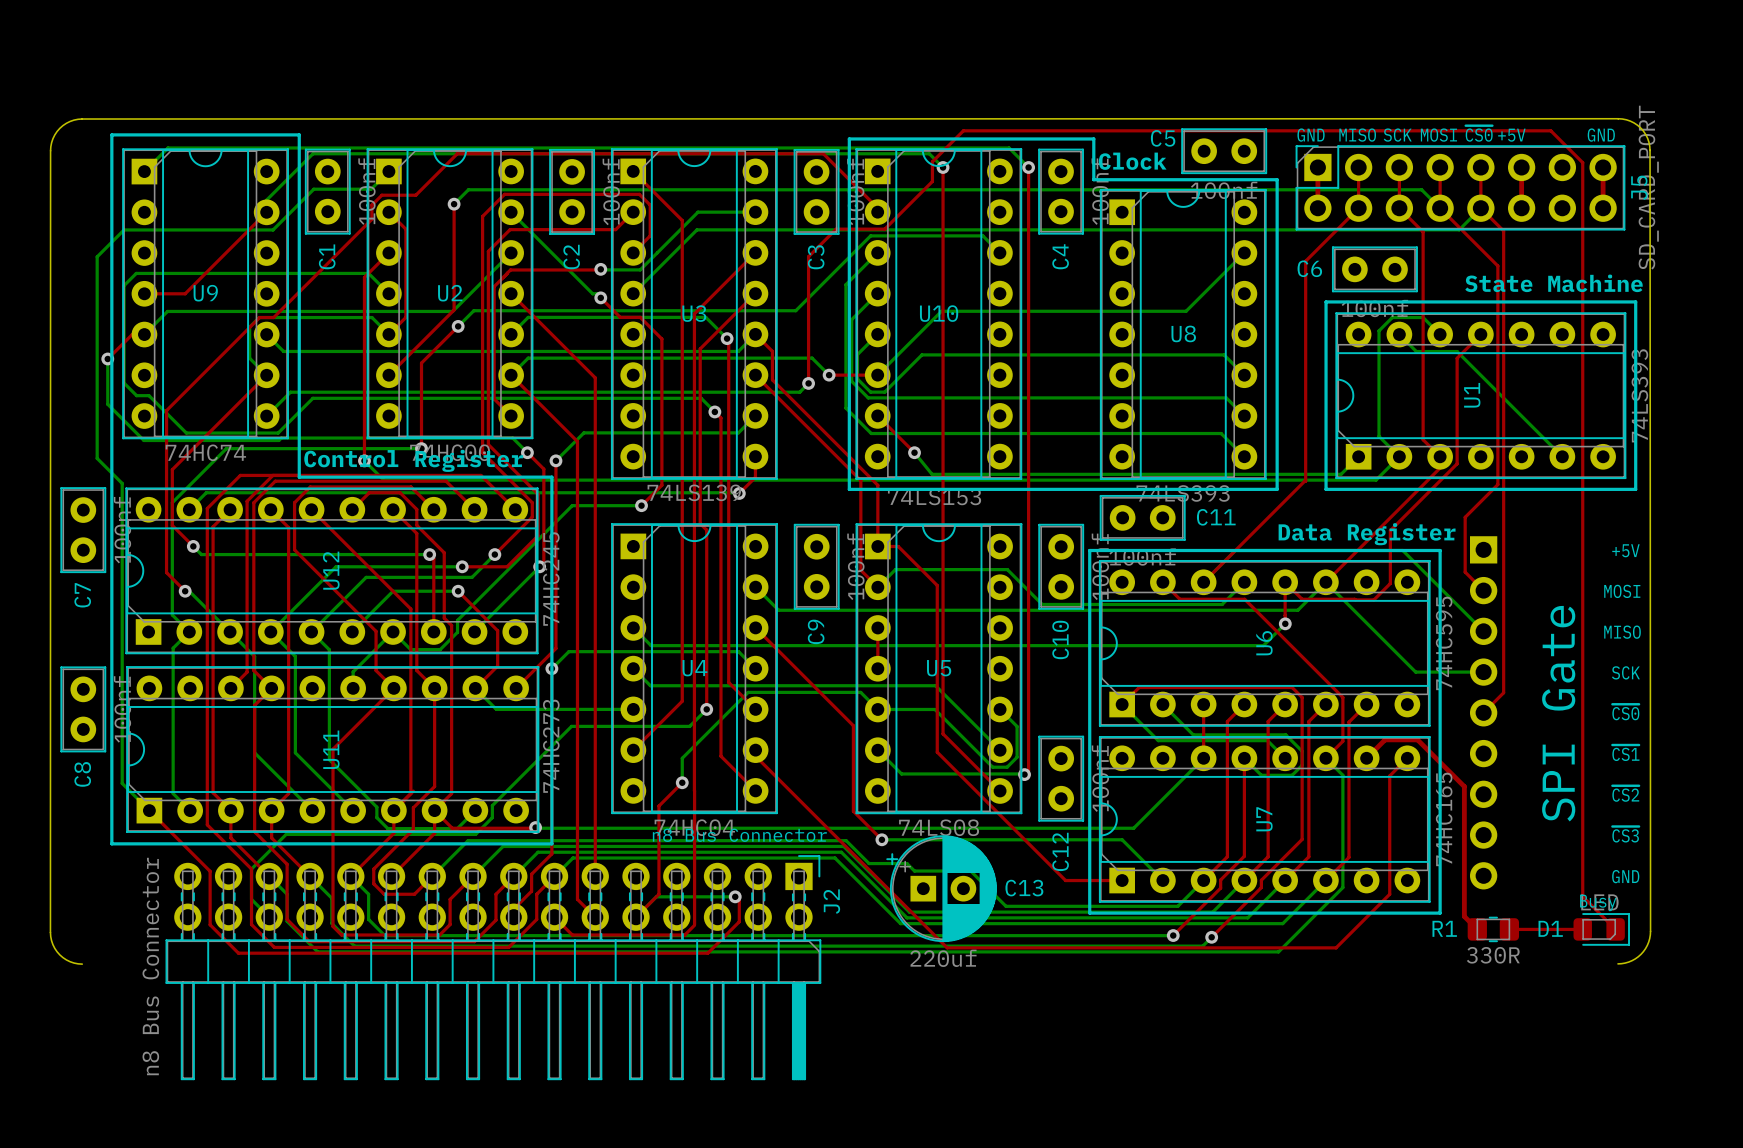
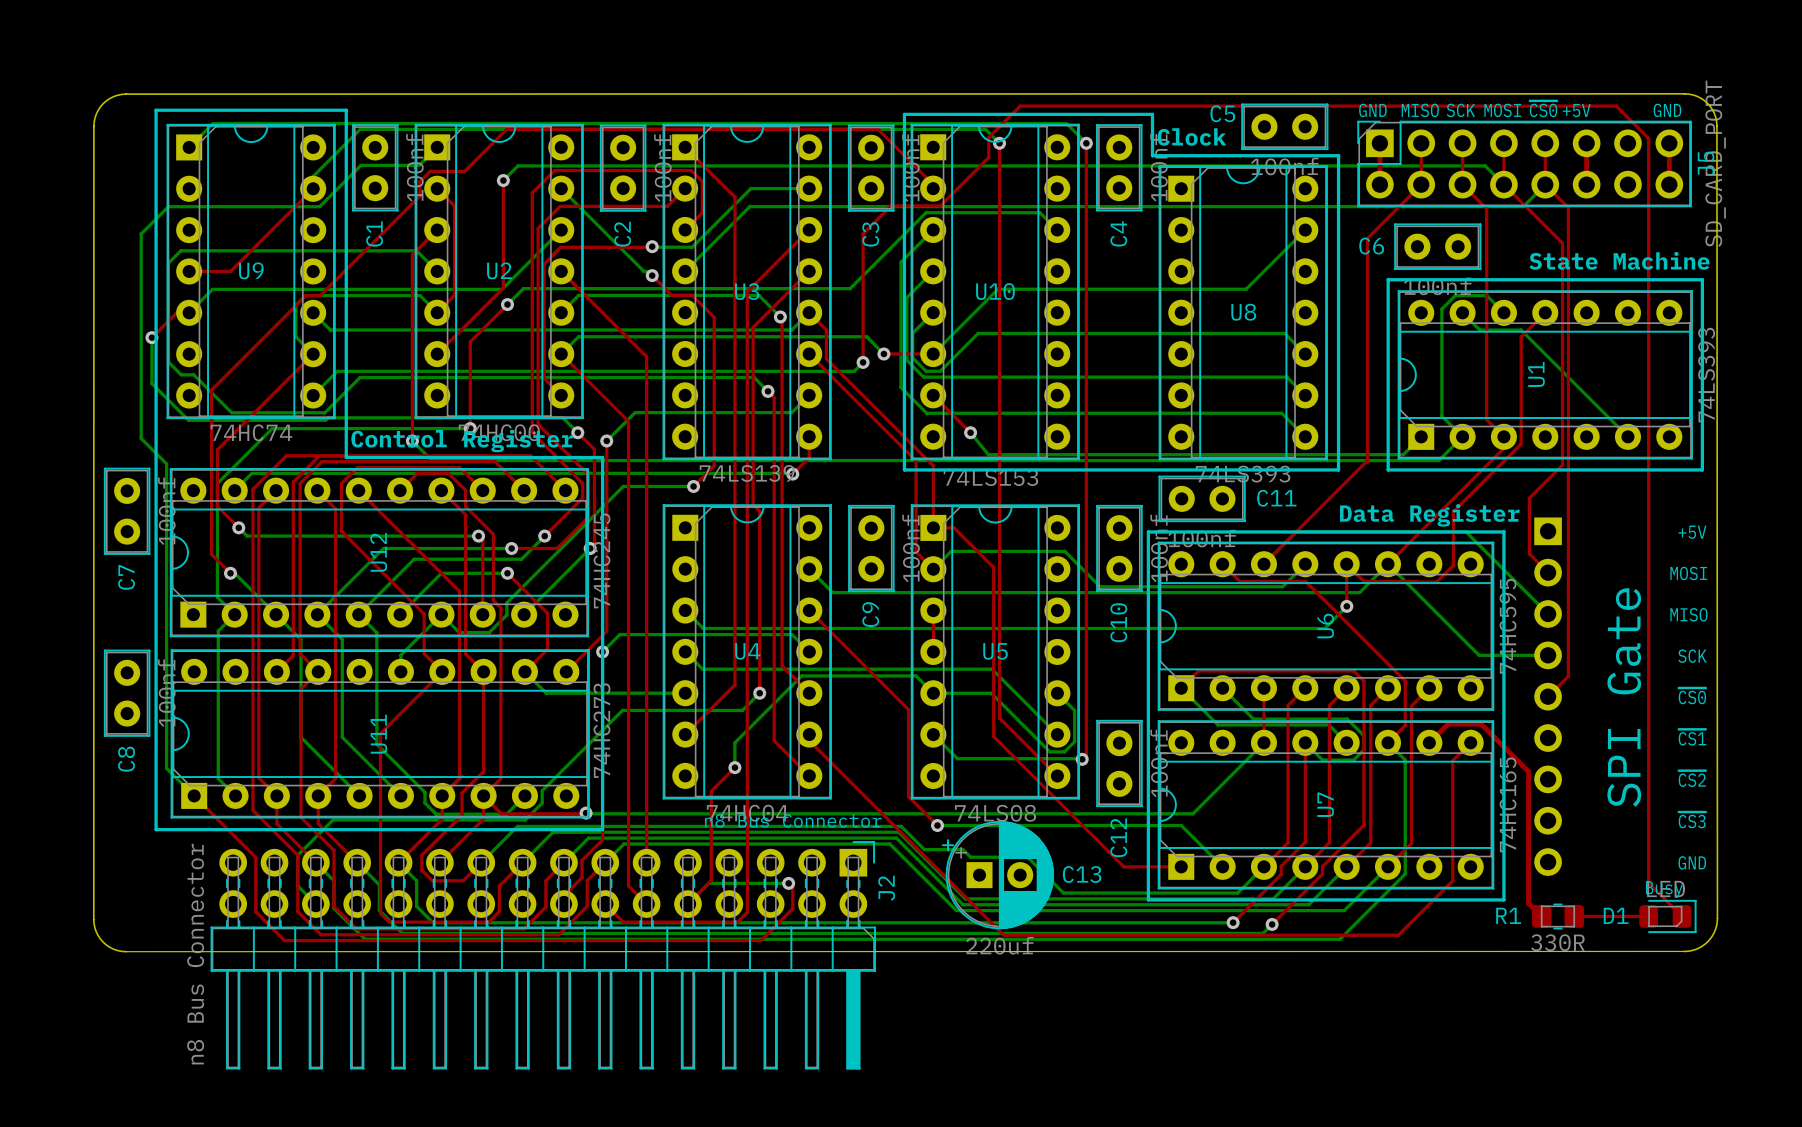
board edge: none -> (1684, 951) (126, 951)

